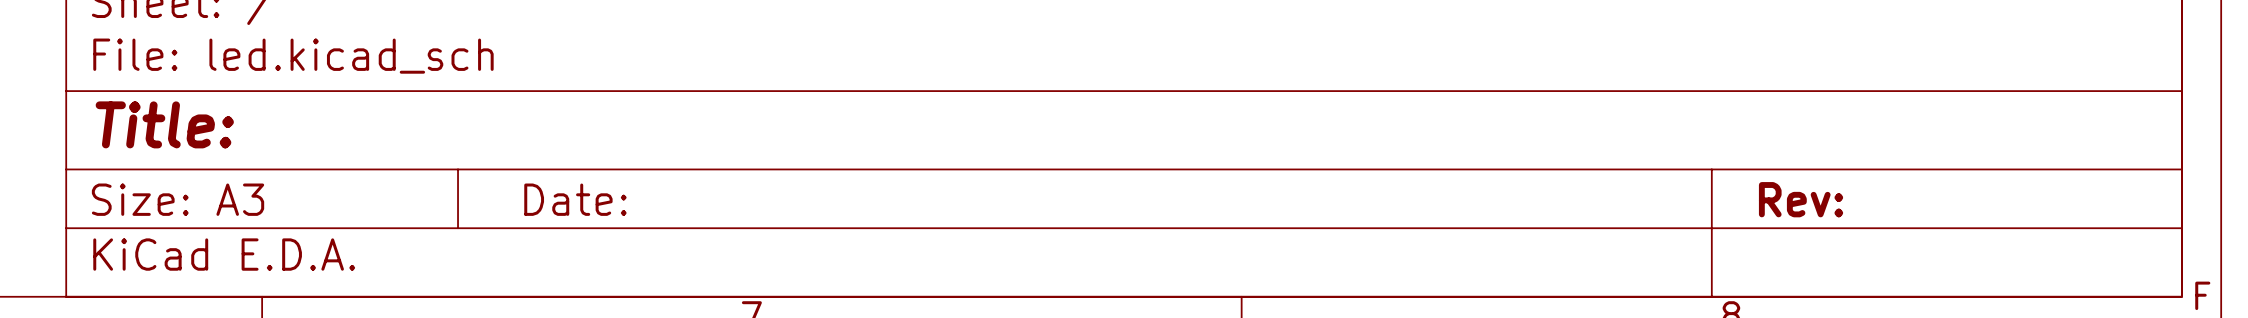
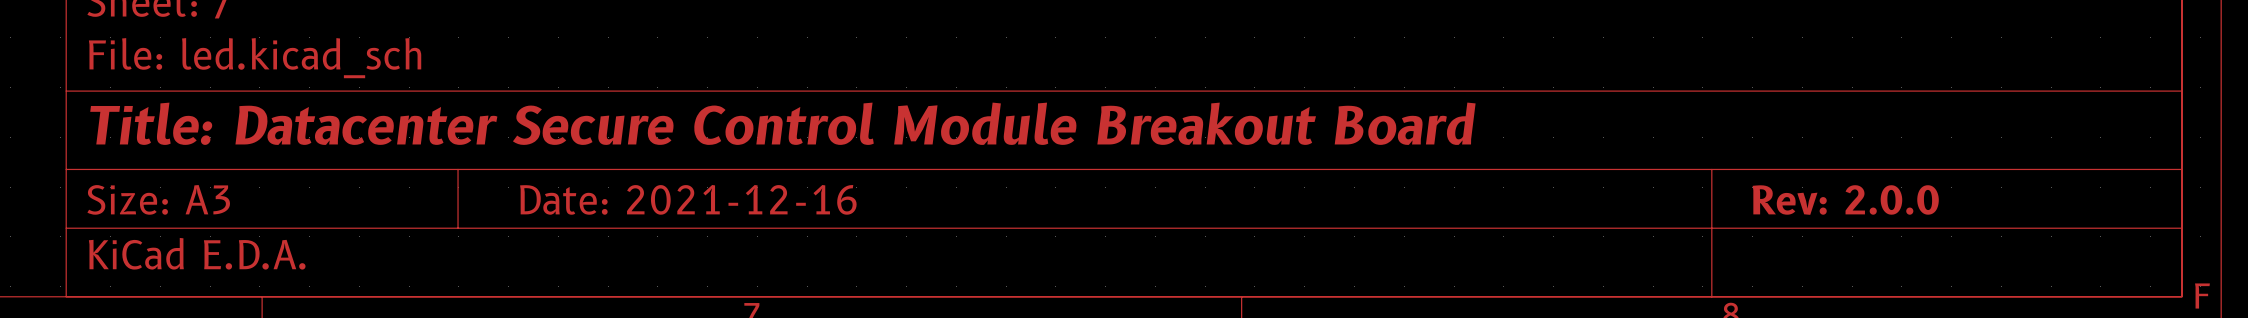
title block: Title: (164, 124) -> Title: Datacenter Secure Control Module Breakout Board (782, 123)
title block: Date: (575, 199) -> Date: 2021-12-16 (688, 199)
title block: Rev: (1801, 199) -> Rev: 2.0.0 (1845, 200)

